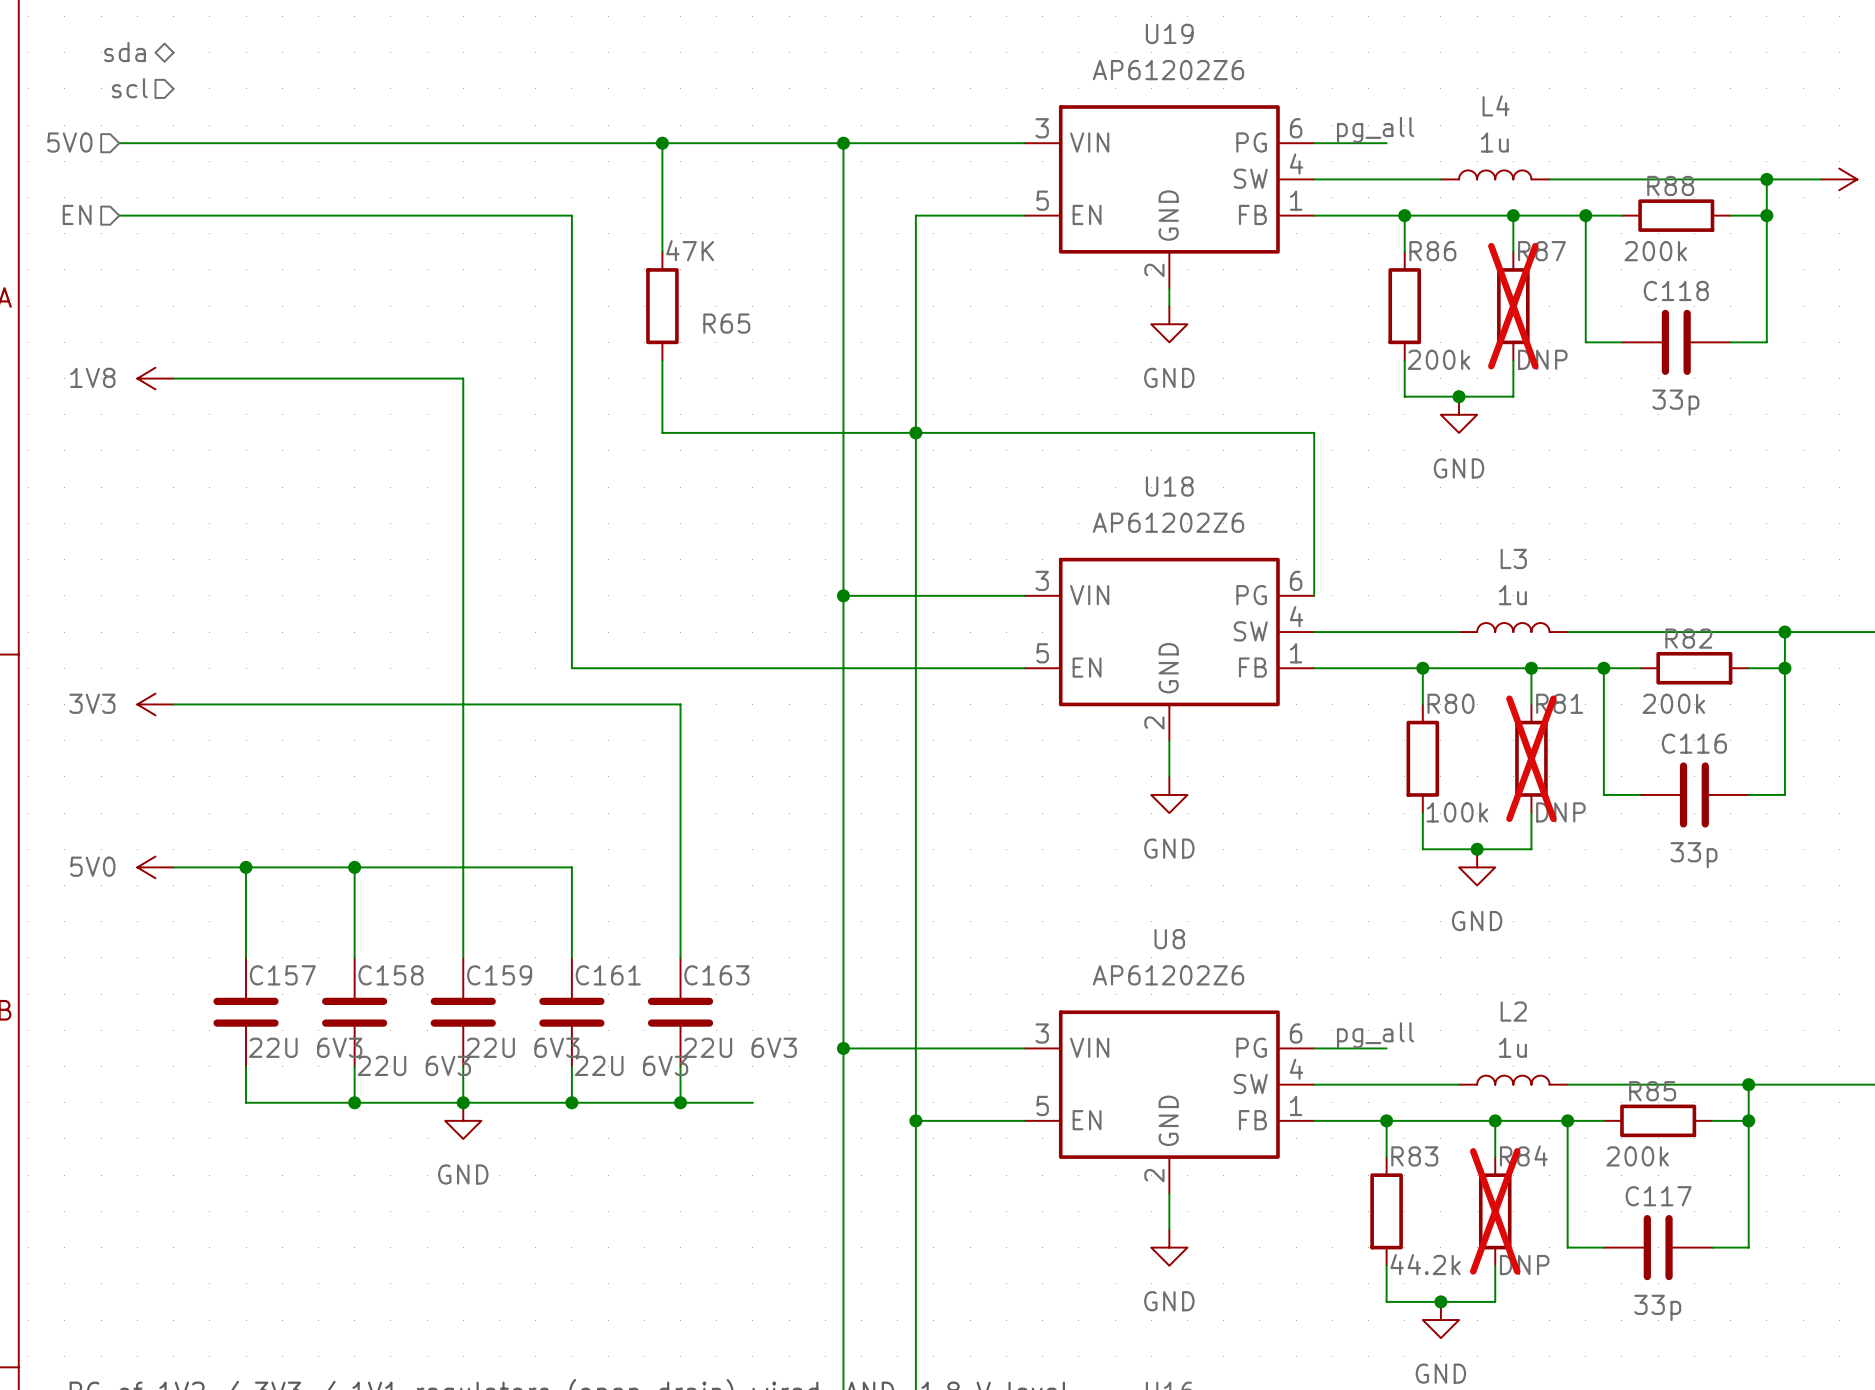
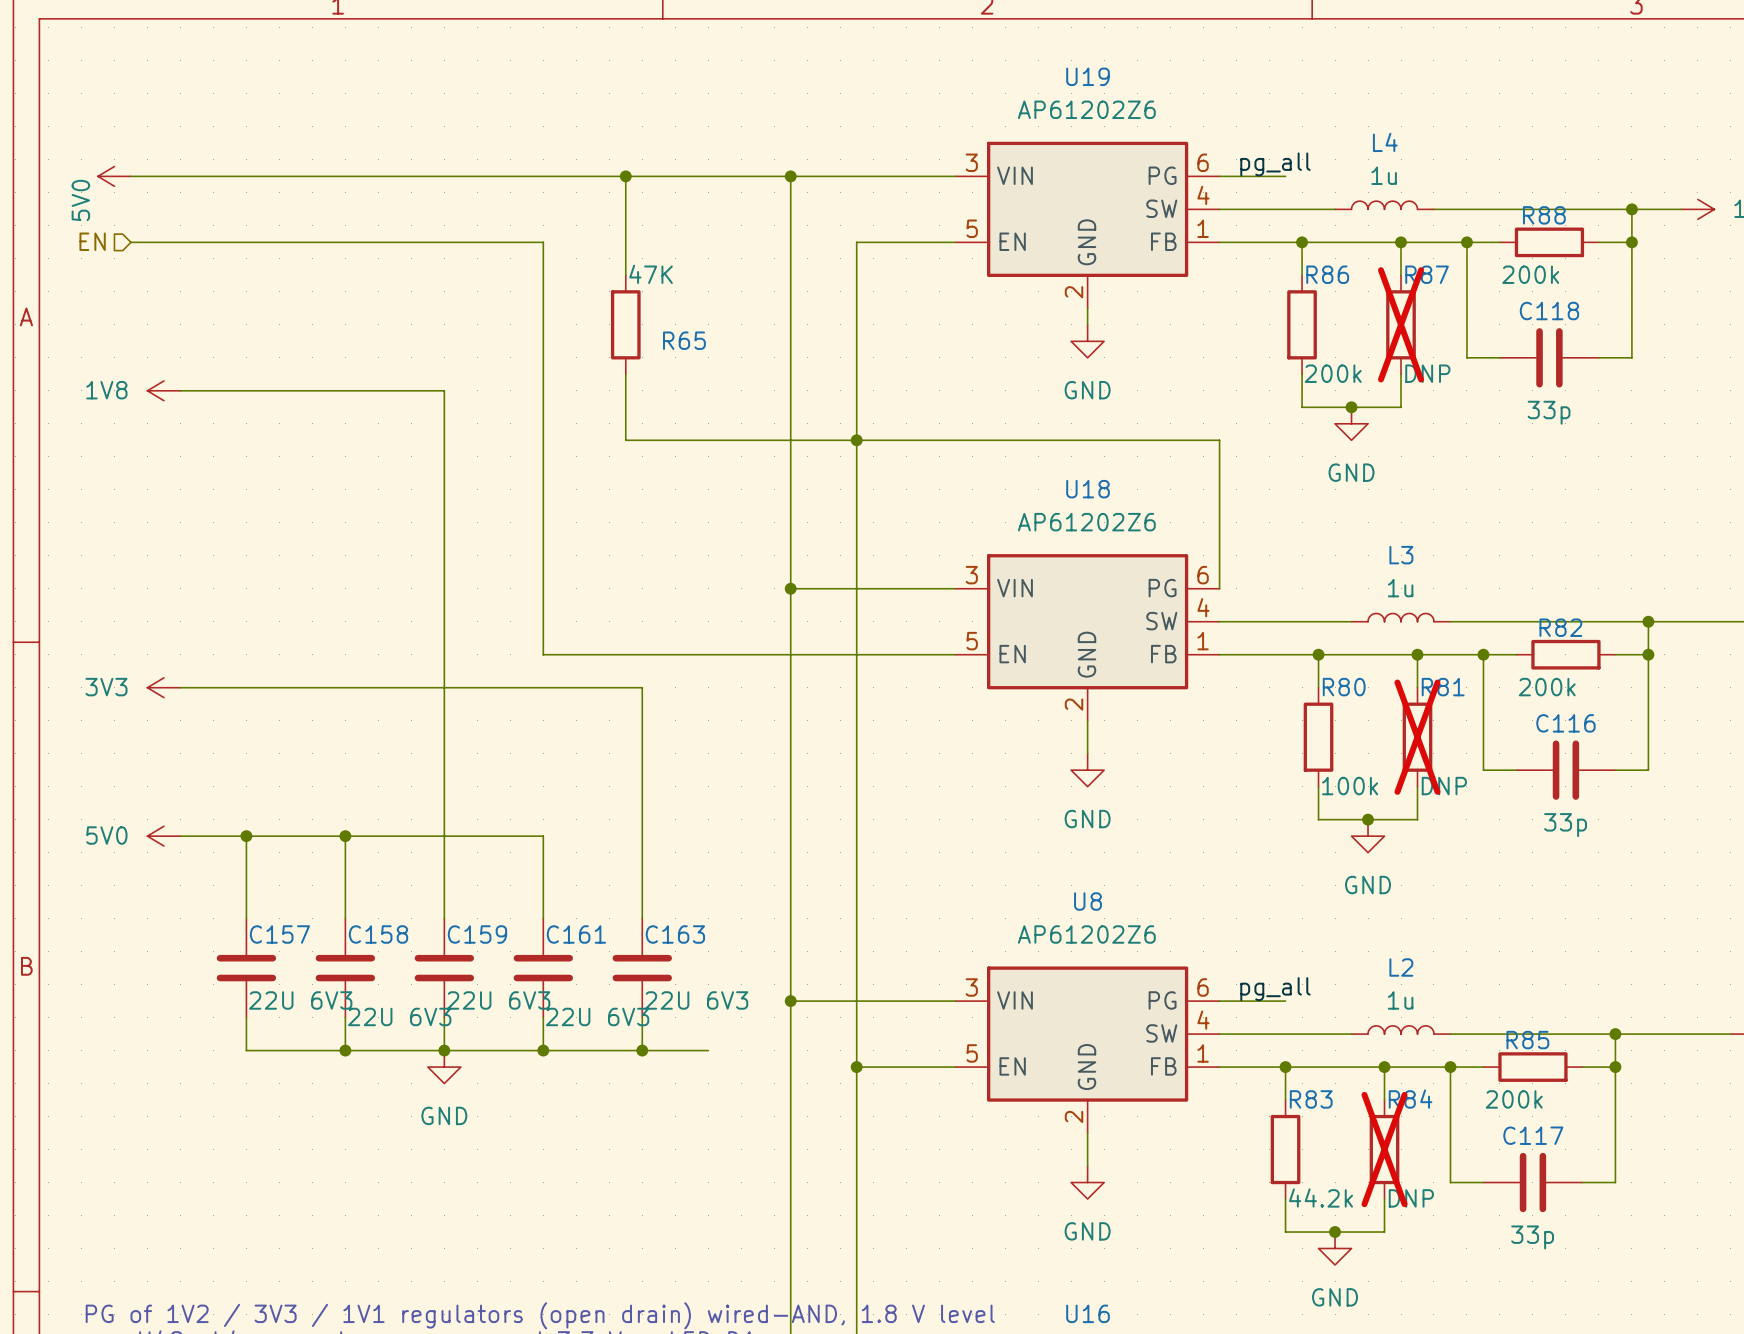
hierarchical label: sda (125, 52) -> none
hierarchical label: scl (129, 88) -> none
hierarchical label: 5V0 (69, 142) -> none
power symbol: none -> 5V0 (114, 176)

